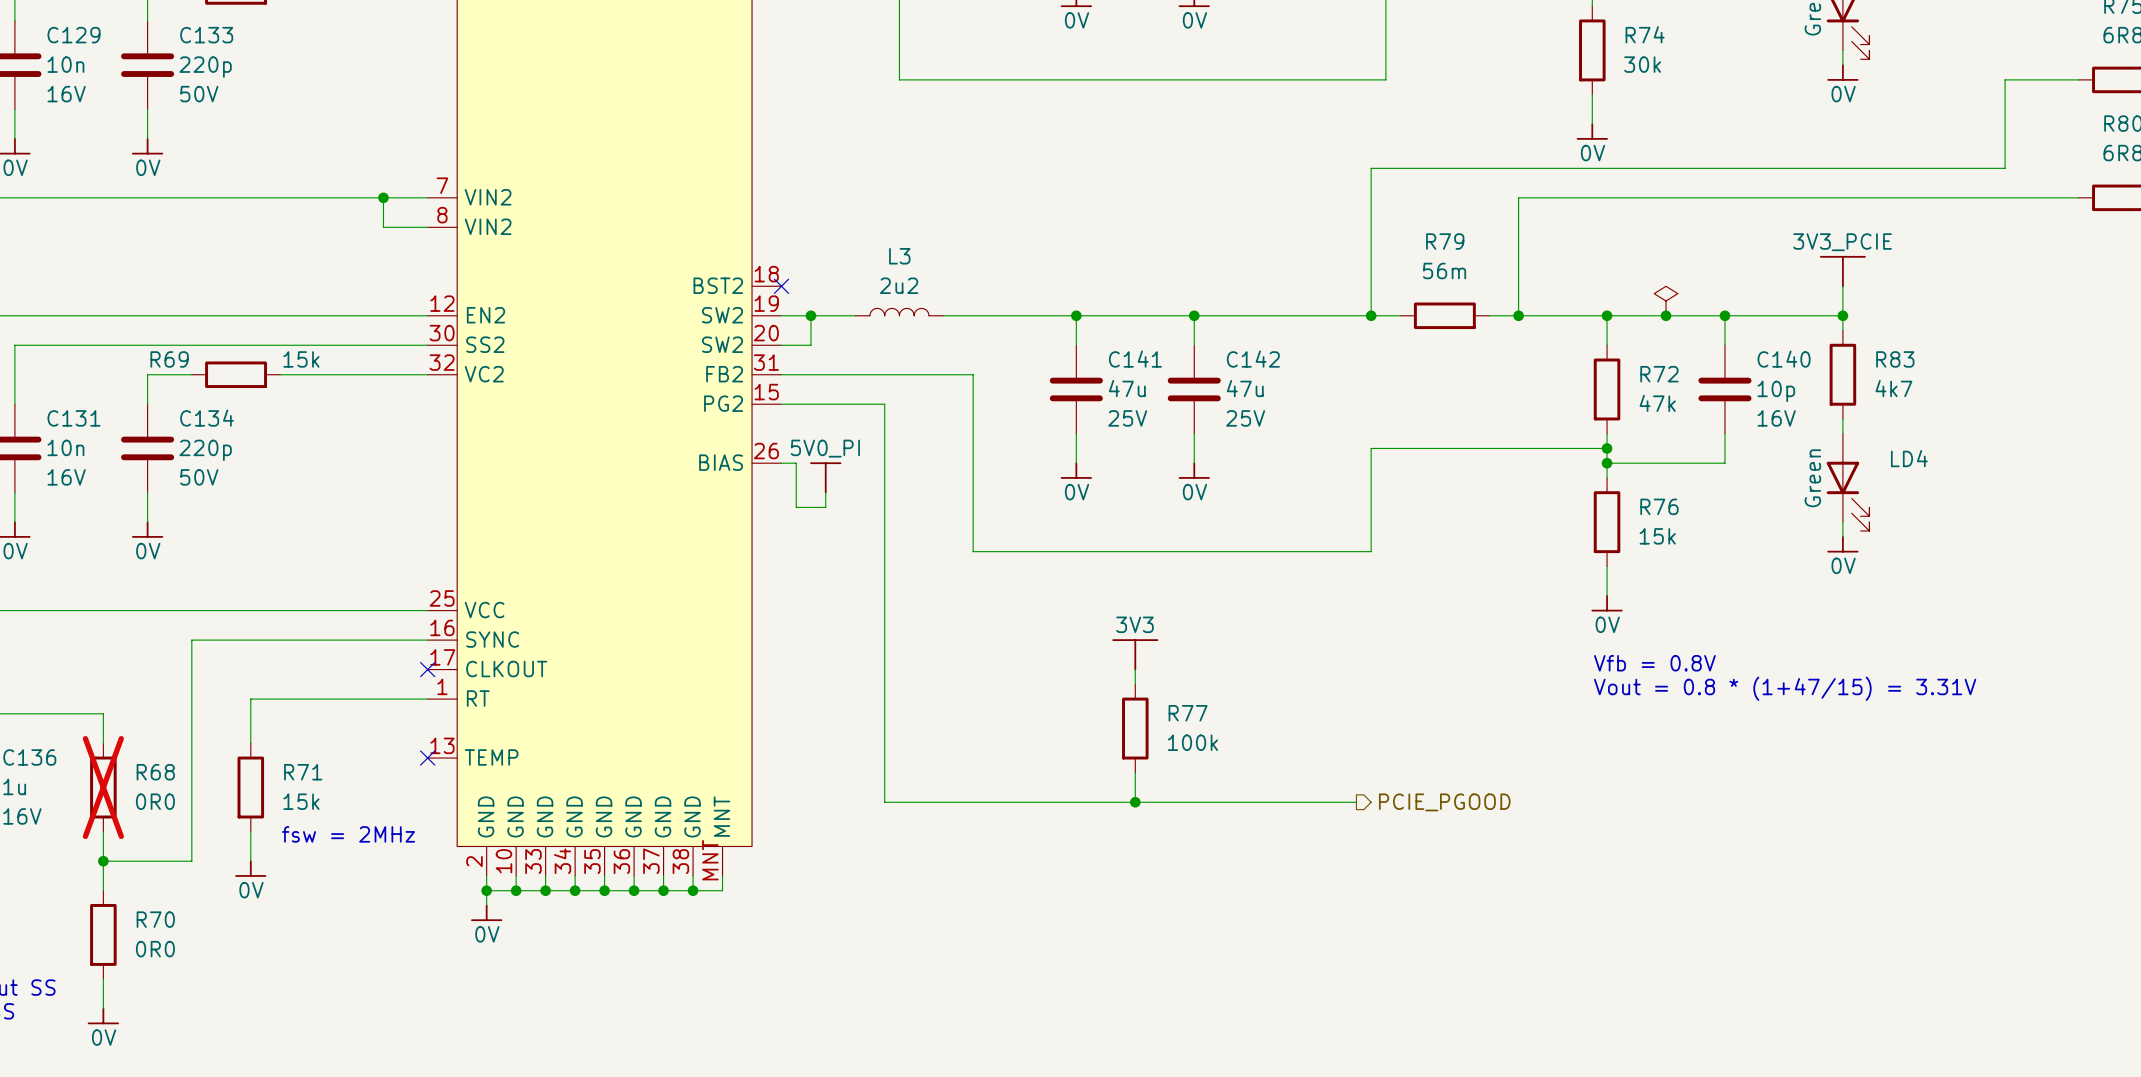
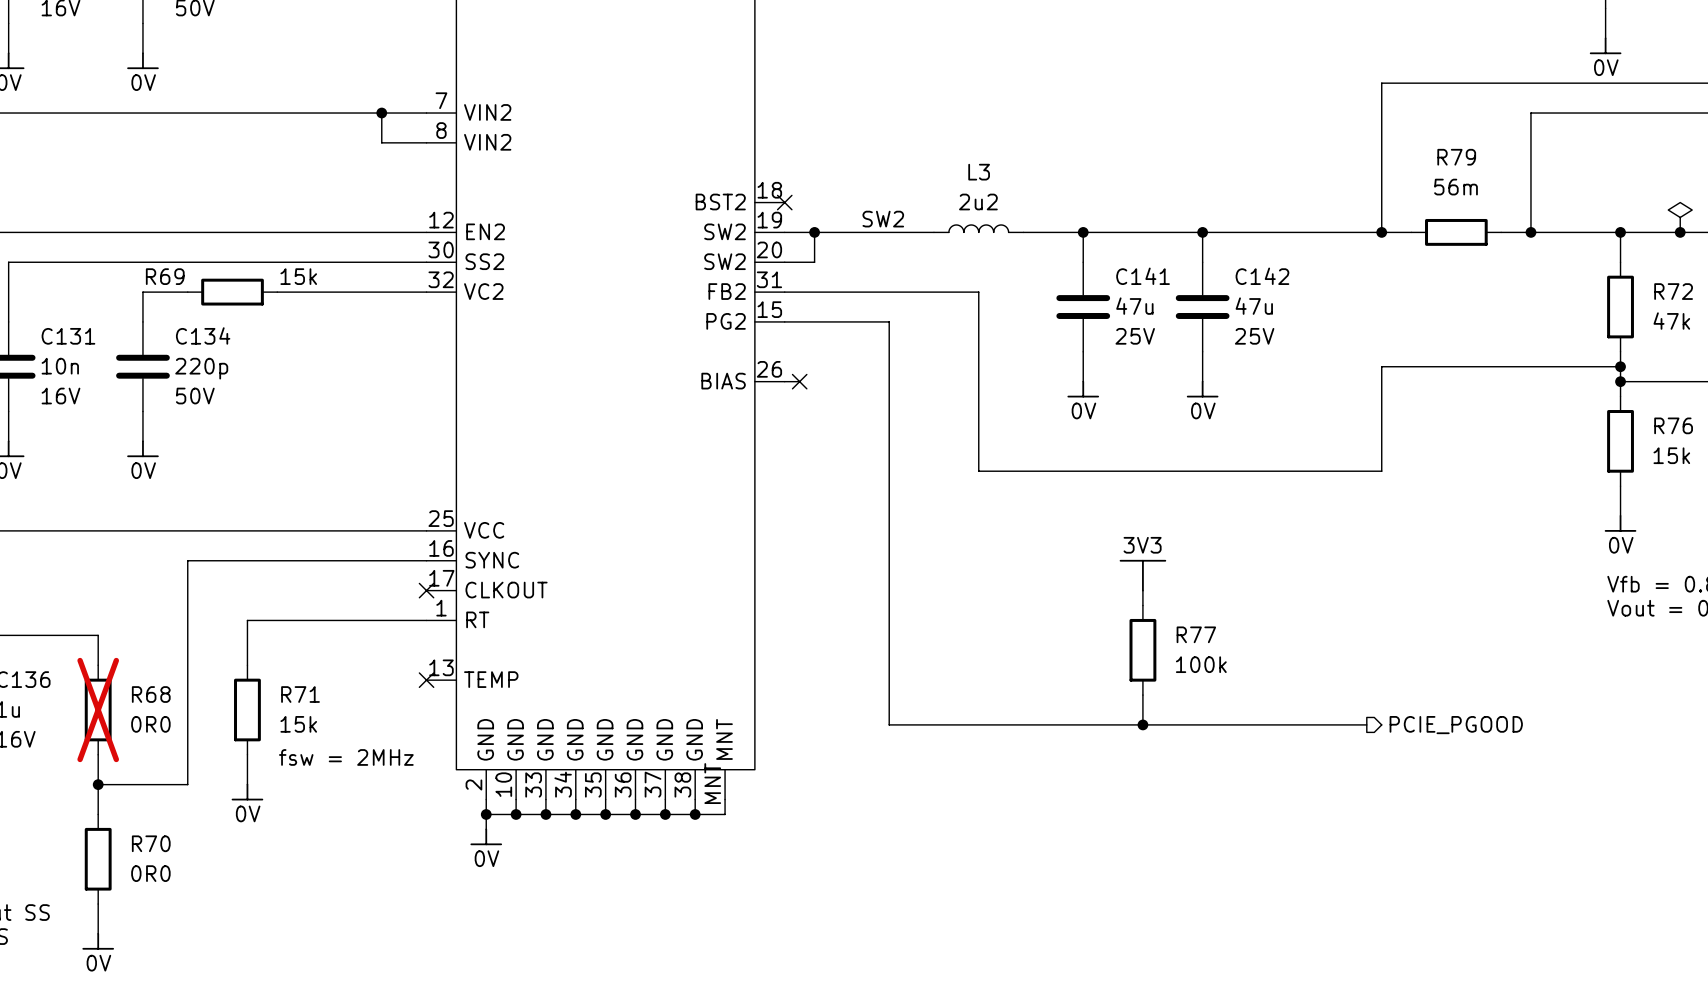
label: none -> SW2 (883, 219)
L3 position: (899, 312) -> (978, 228)
wire: (943, 315) (1017, 315) -> (859, 232) (933, 232)
wire: (796, 463) (796, 507) (825, 507) (825, 492) -> none
no-connect mark: none -> (799, 381)
power symbol: 5V0_PI (825, 477) -> none

